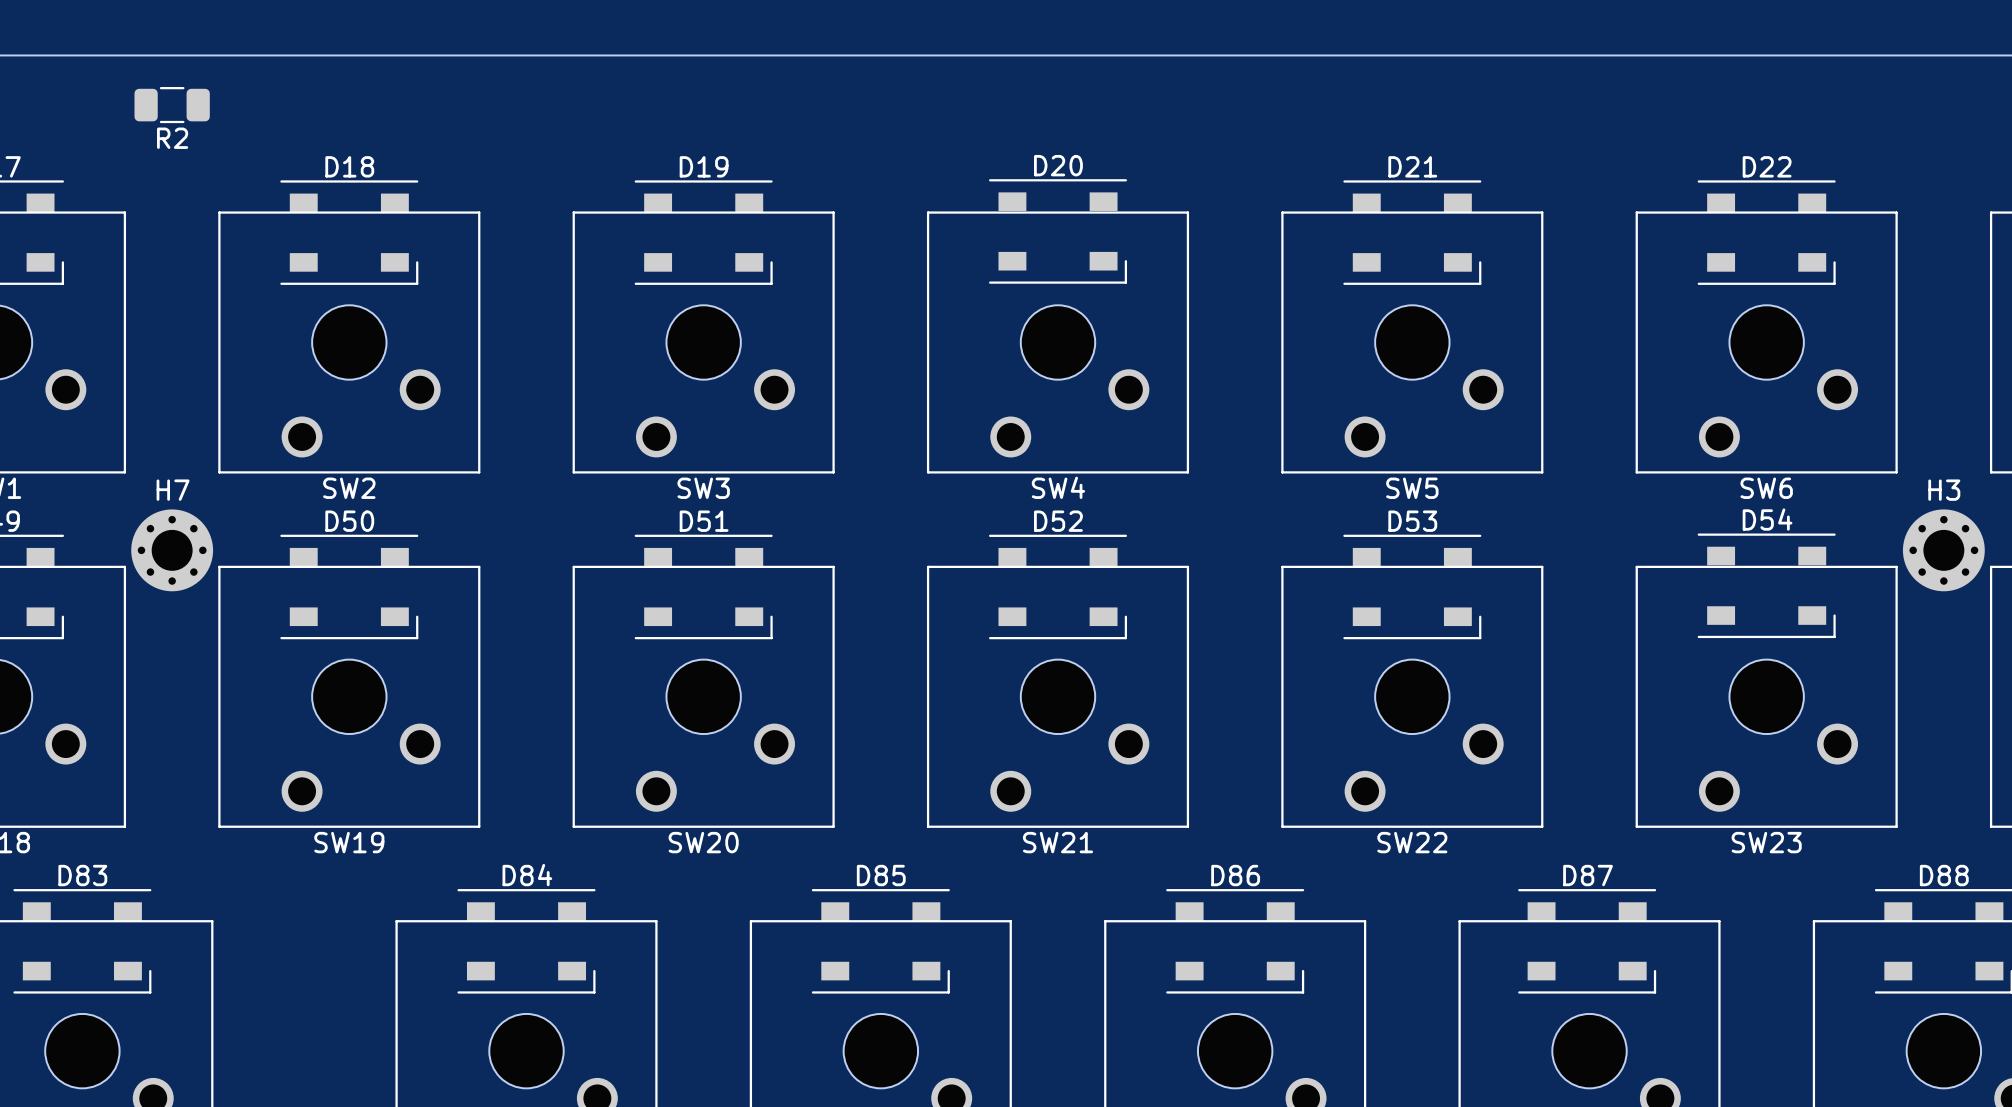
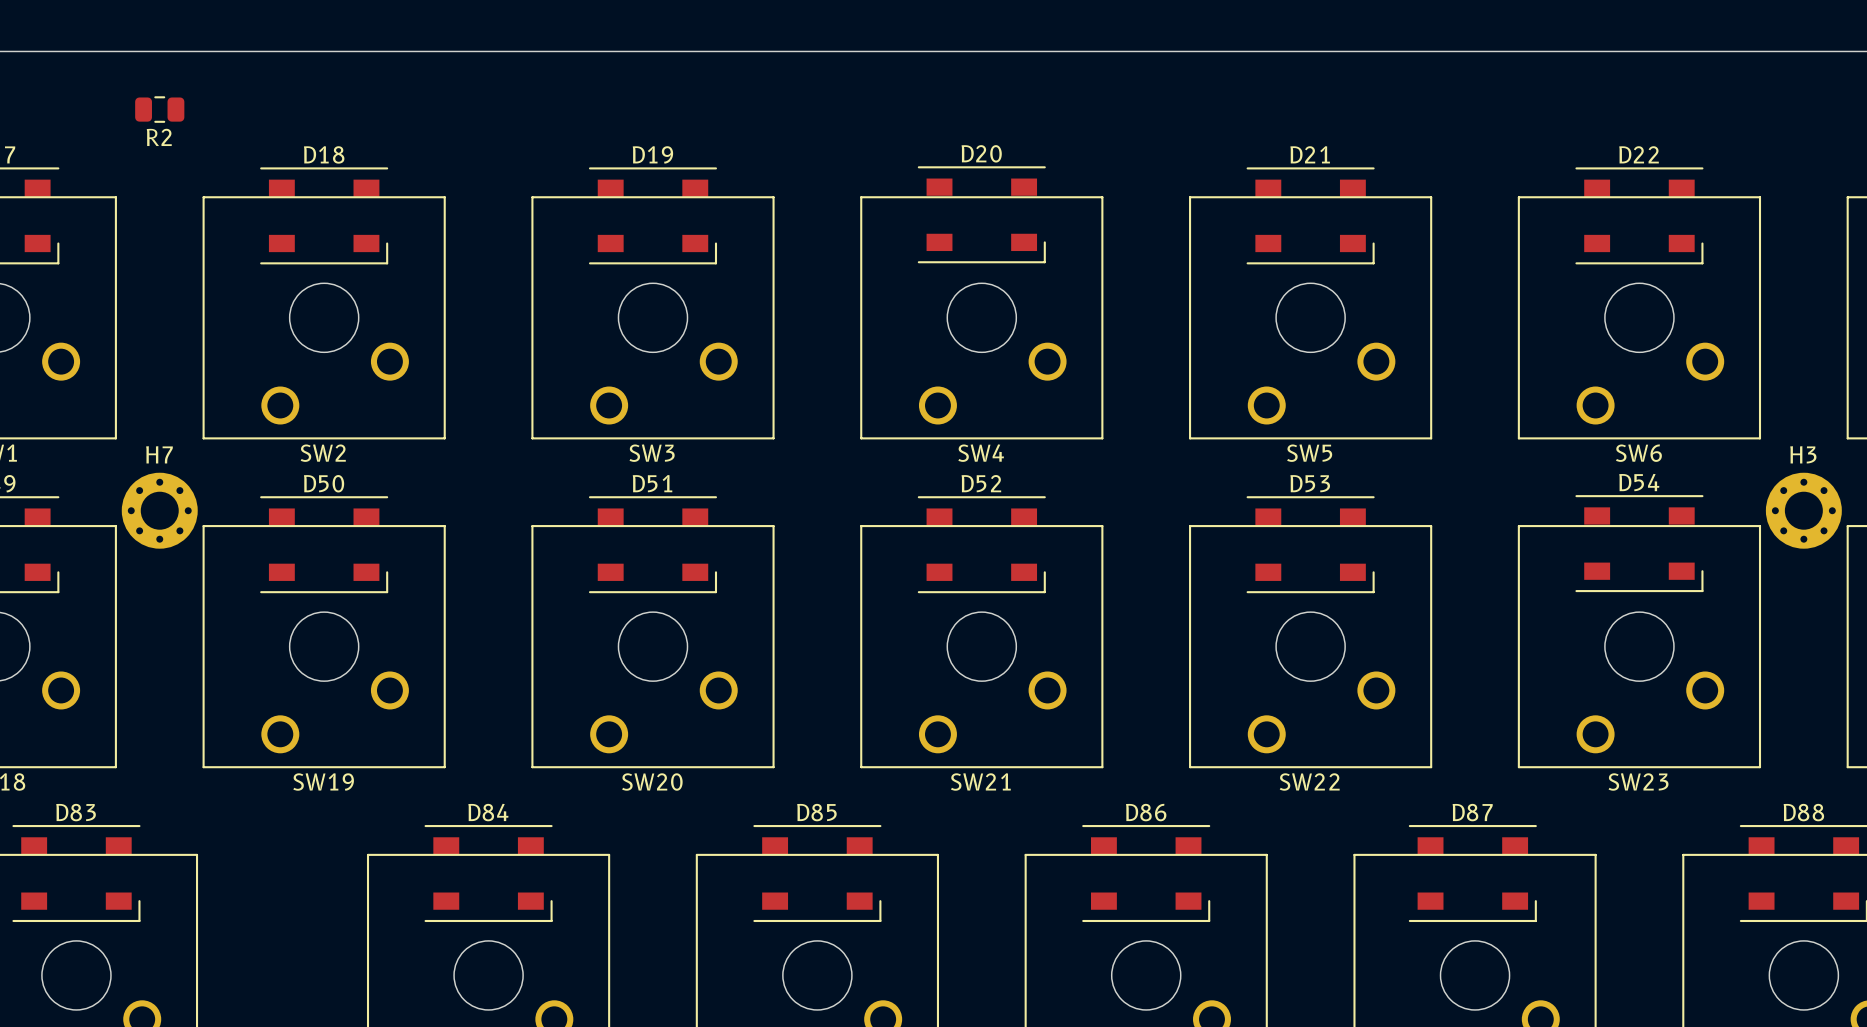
R2 footprint: [134, 87, 210, 124] -> [135, 96, 185, 123]

